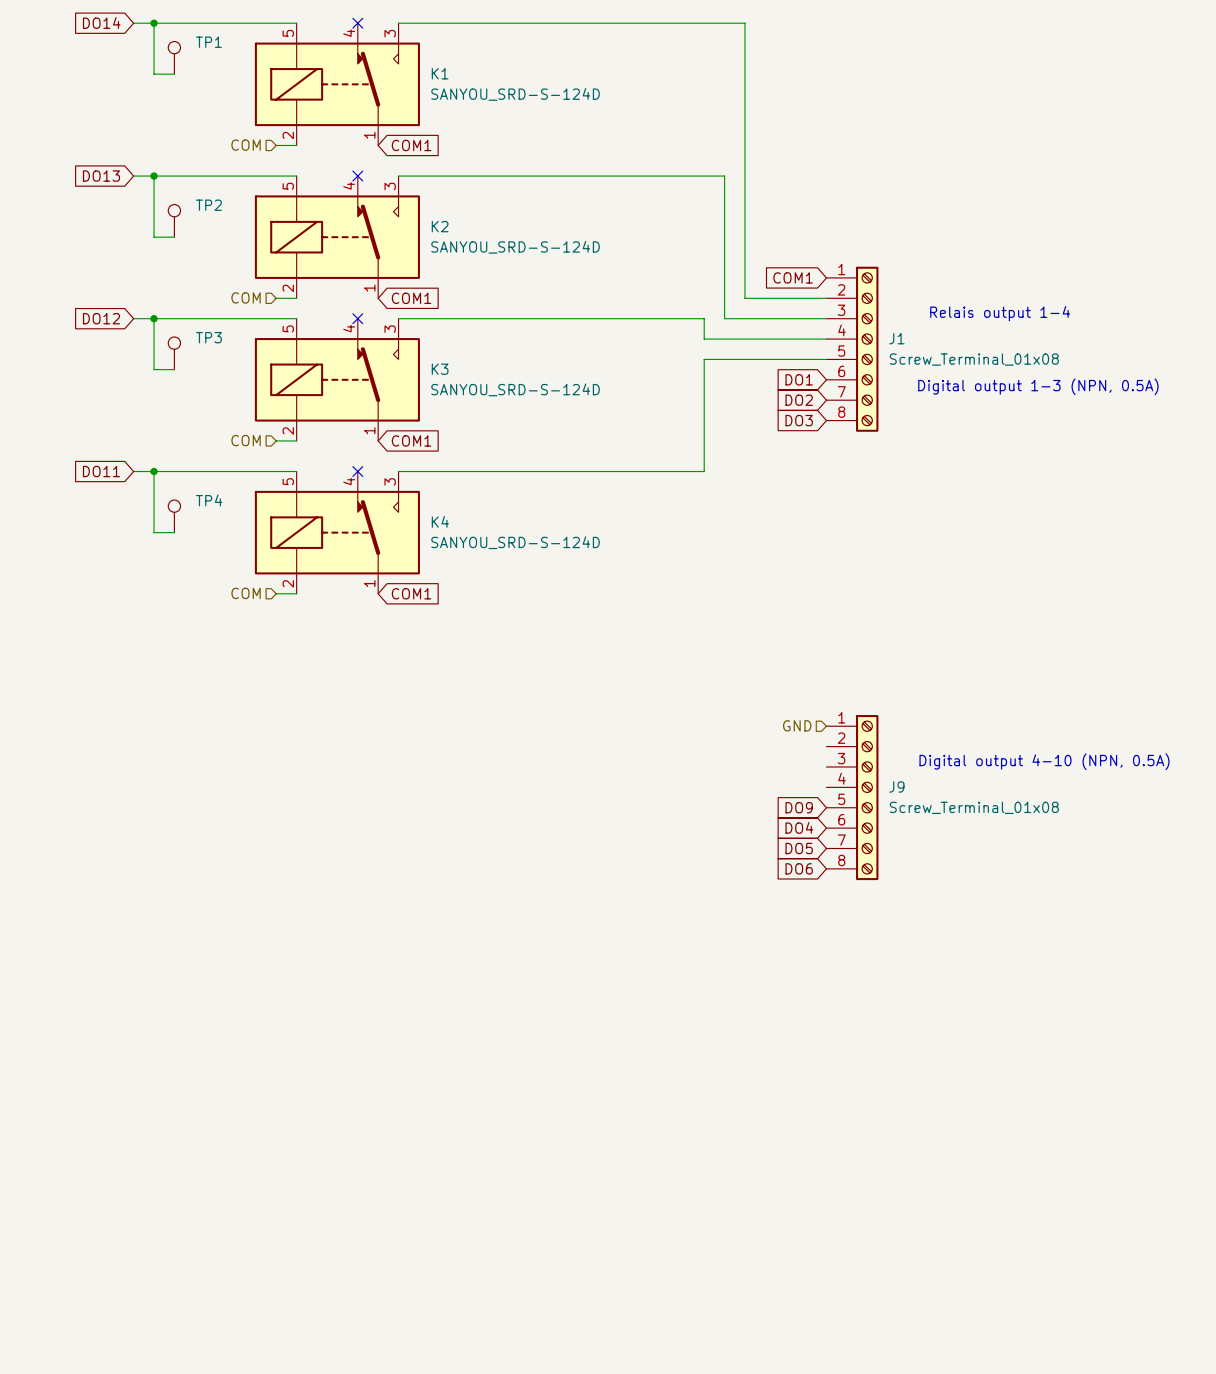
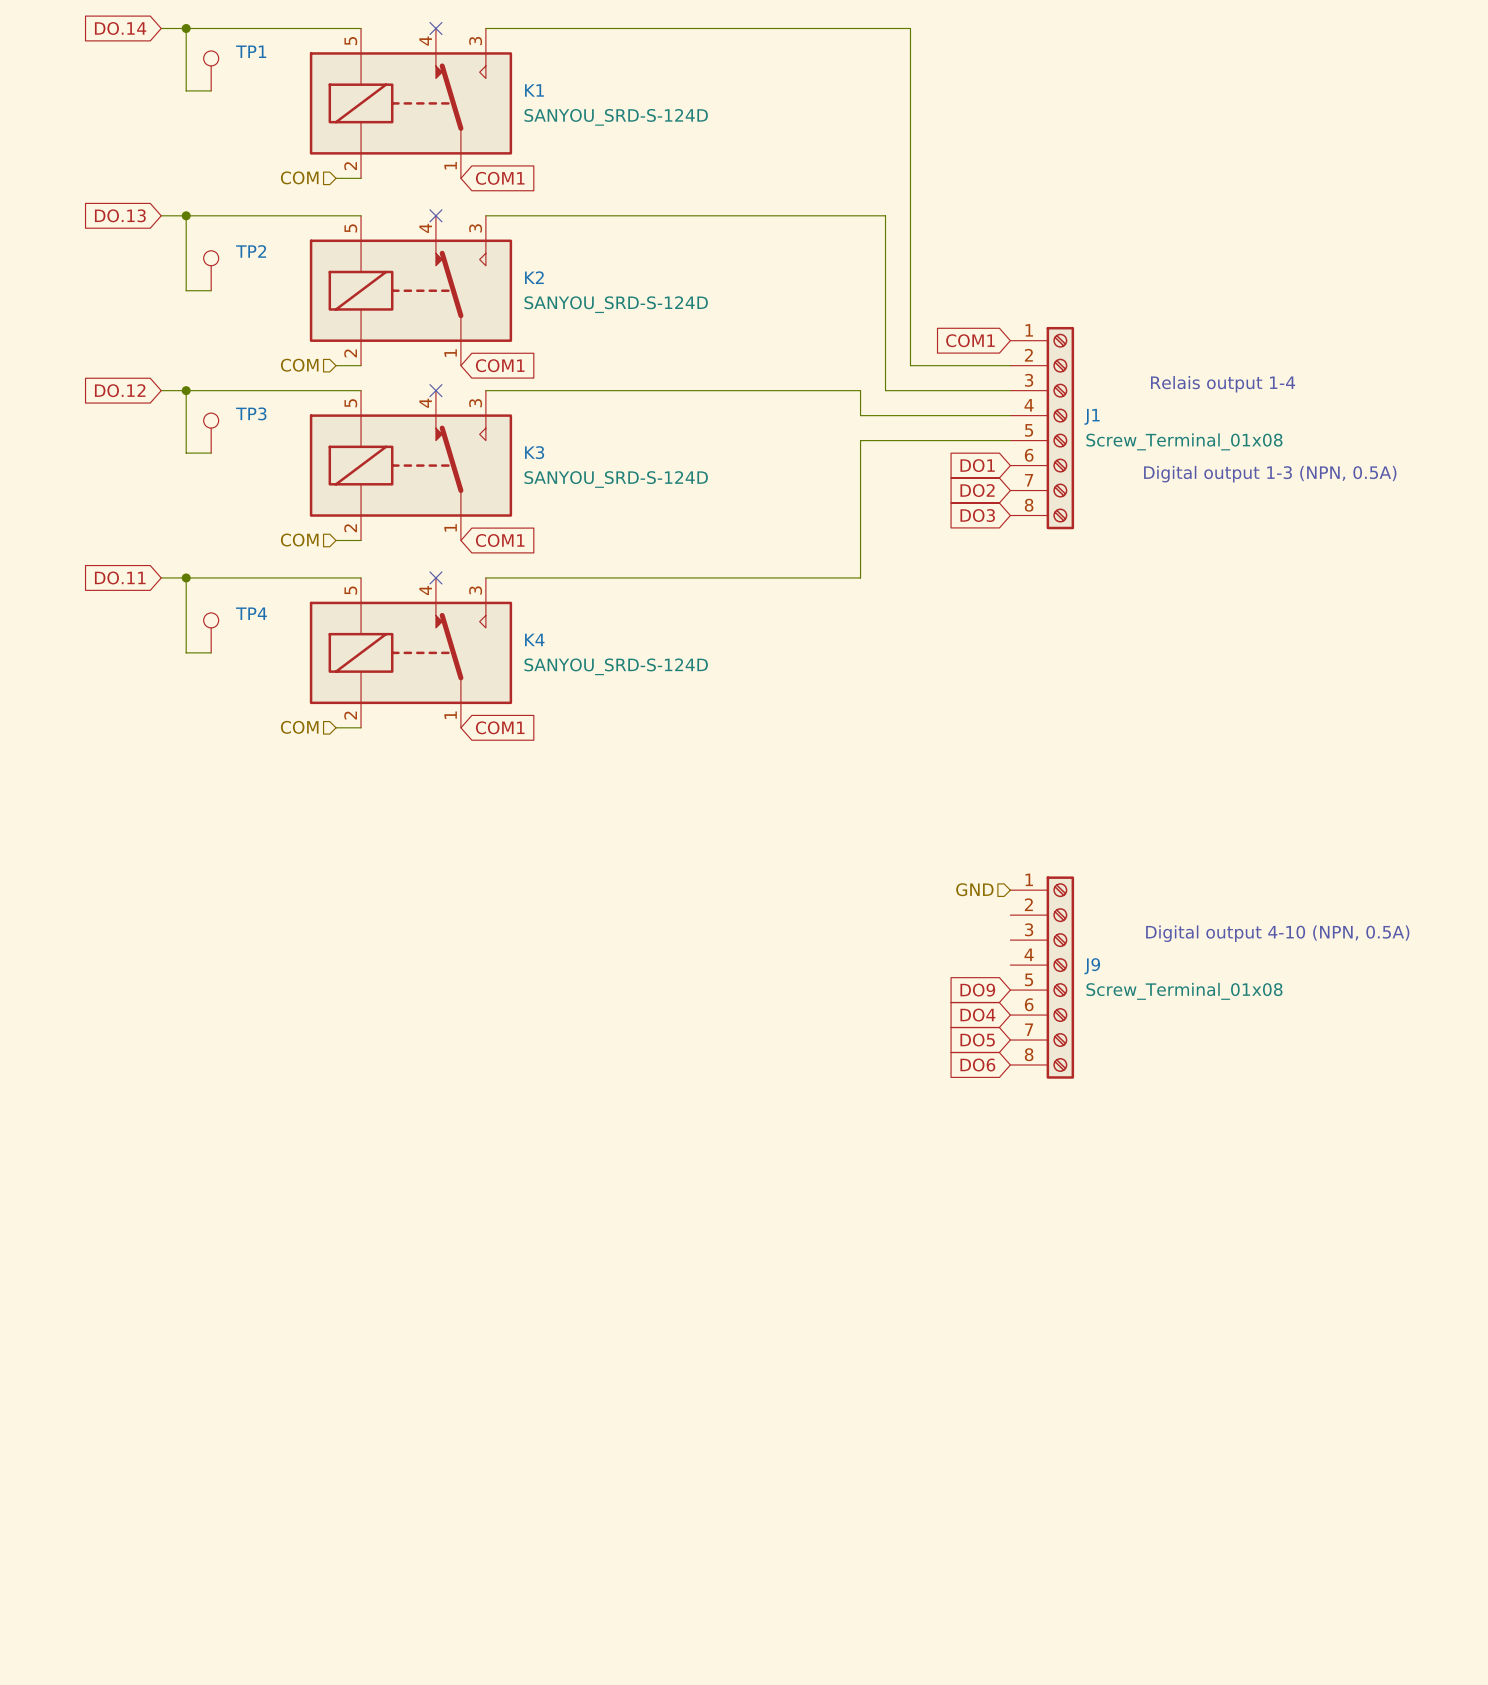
global label: DO14 (101, 22) -> DO.14 (120, 28)
global label: DO13 (101, 176) -> DO.13 (120, 215)
global label: DO12 (101, 318) -> DO.12 (120, 390)
global label: DO11 (101, 471) -> DO.11 (120, 577)

